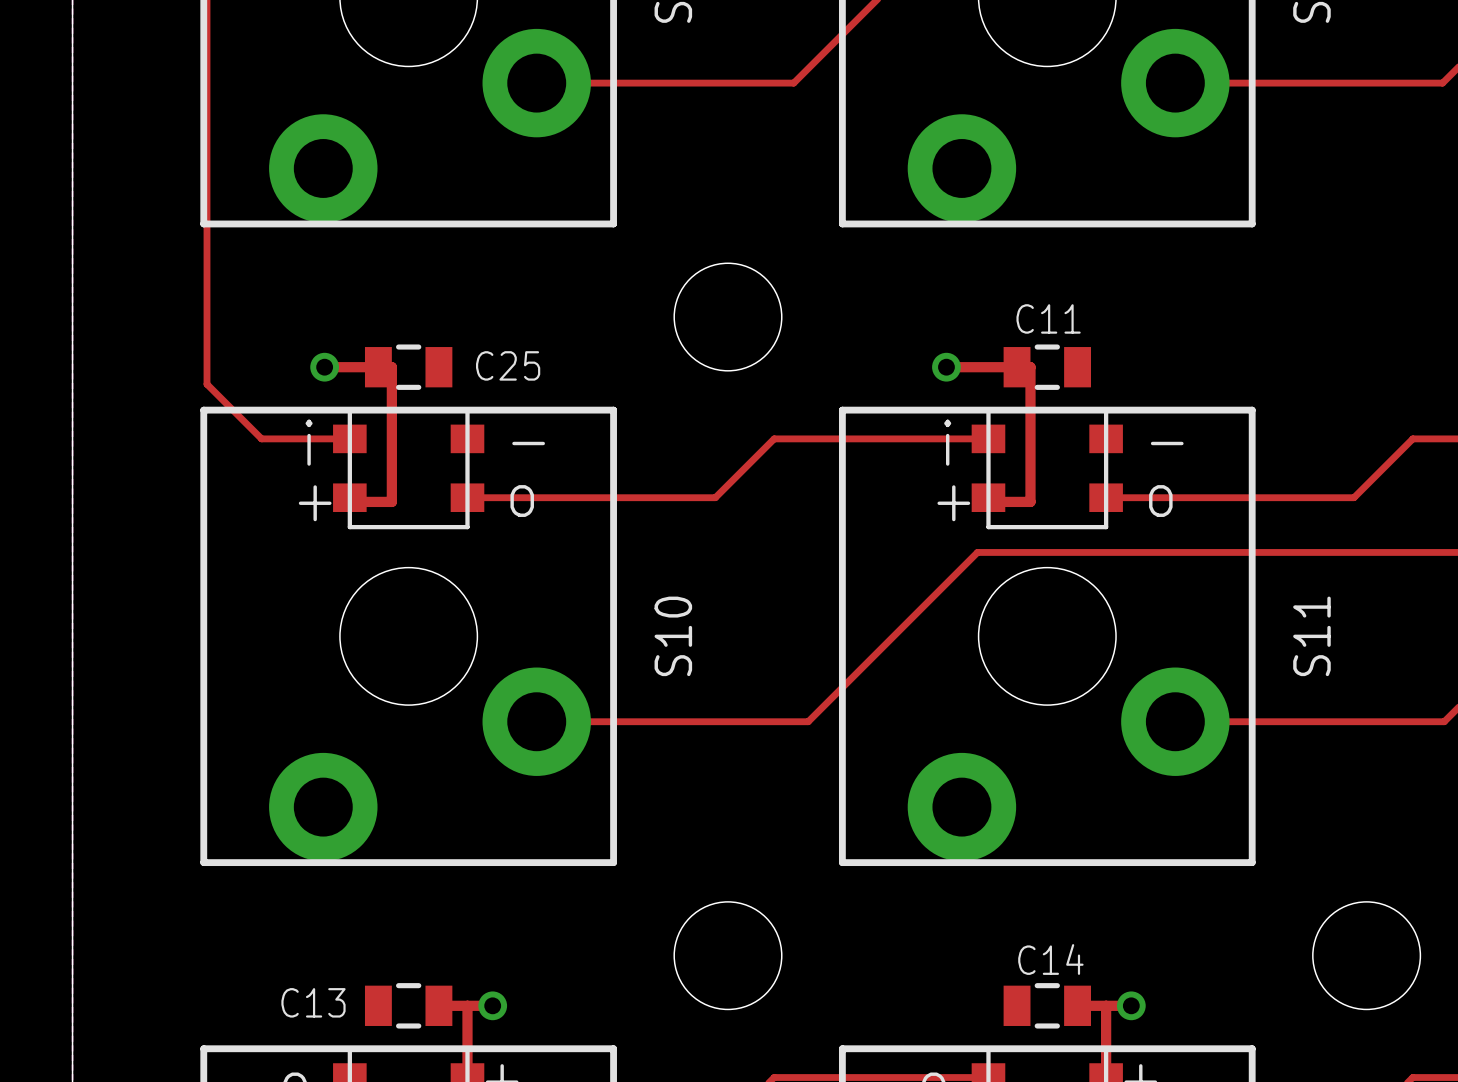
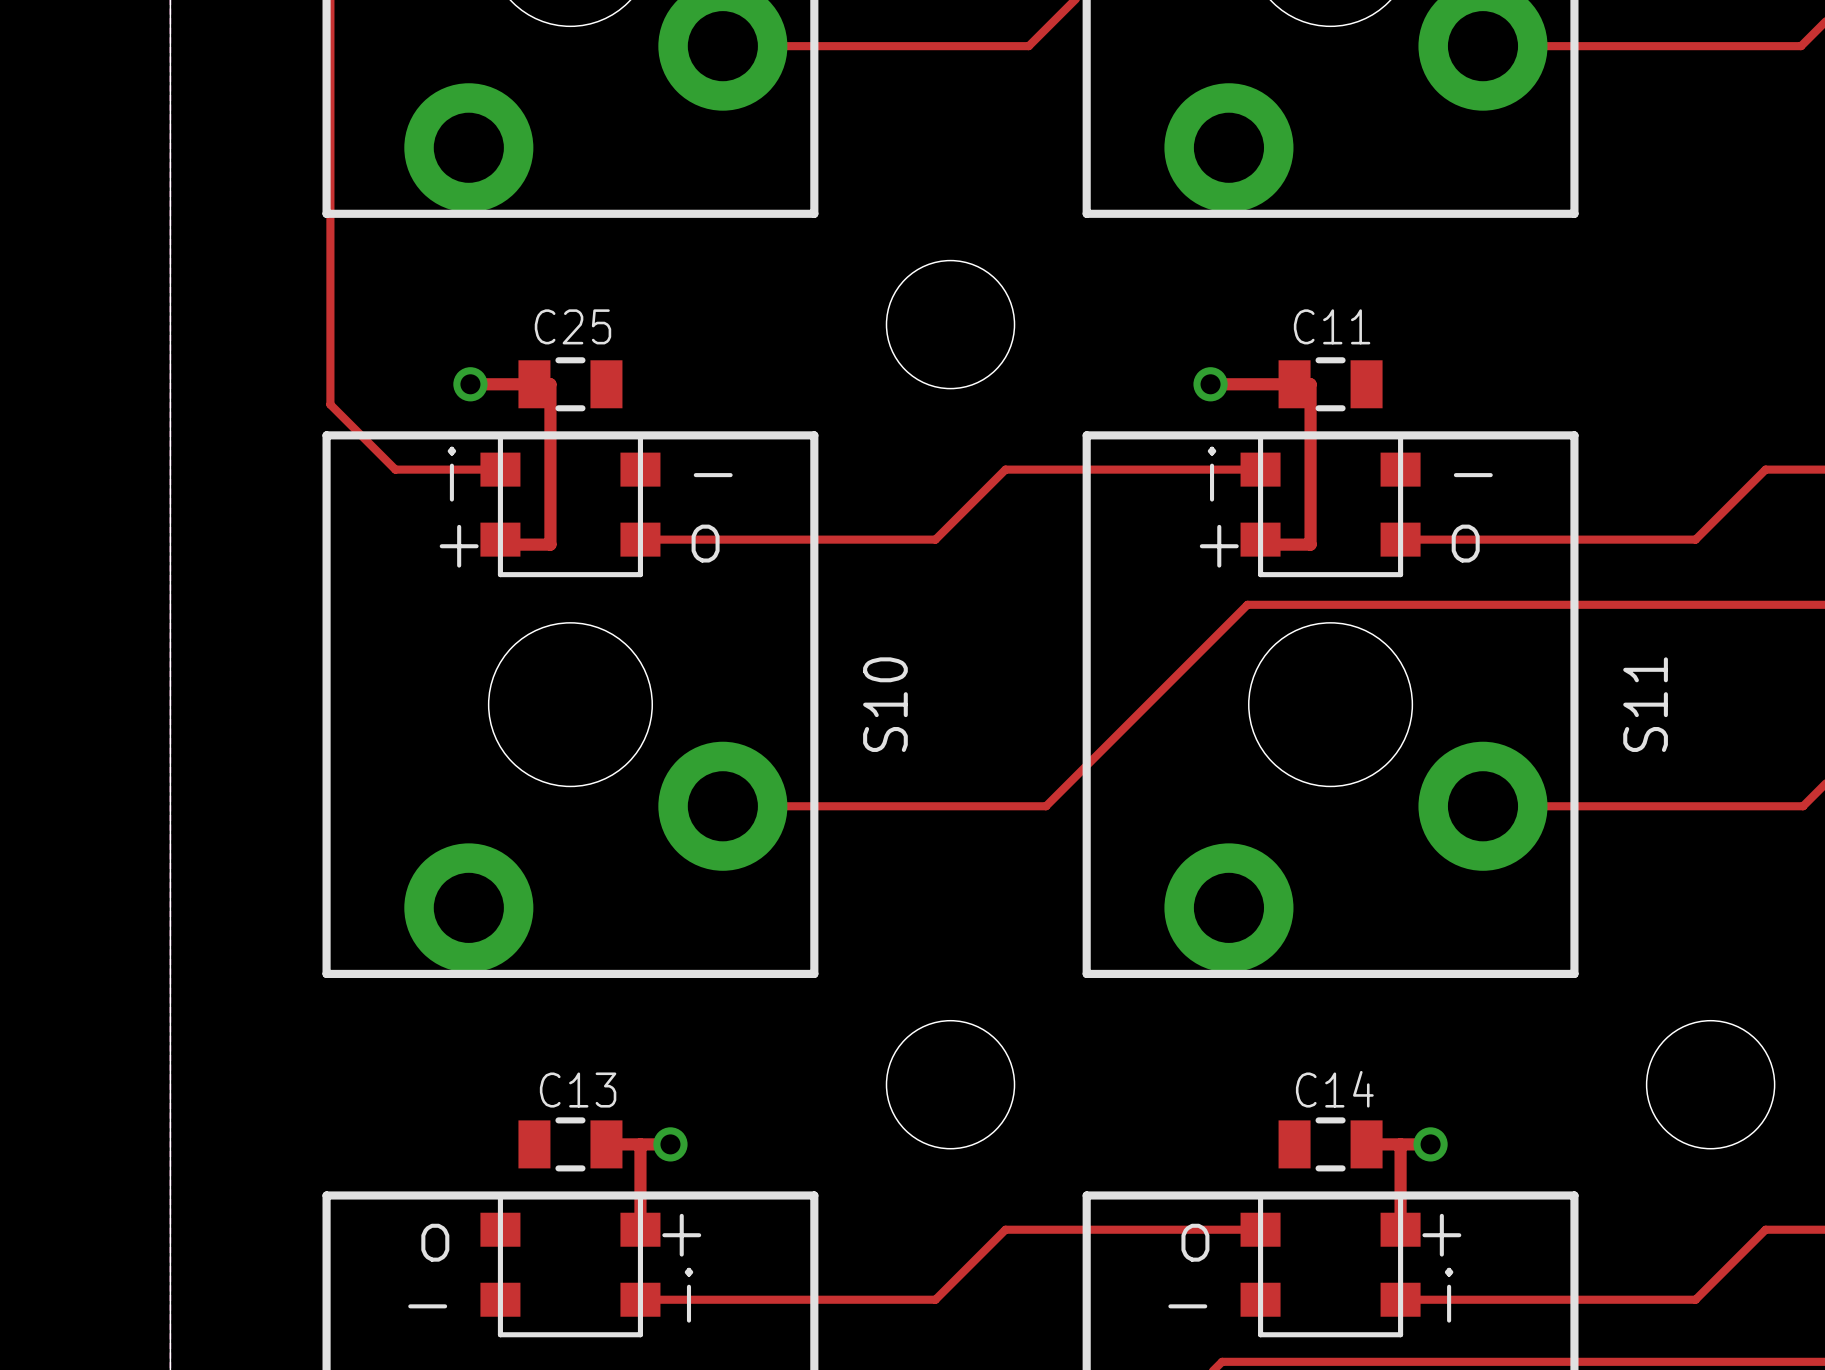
C25 name position: C25 (508, 365) -> C25 (572, 326)
C13 name position: C13 (313, 1002) -> C13 (578, 1090)

